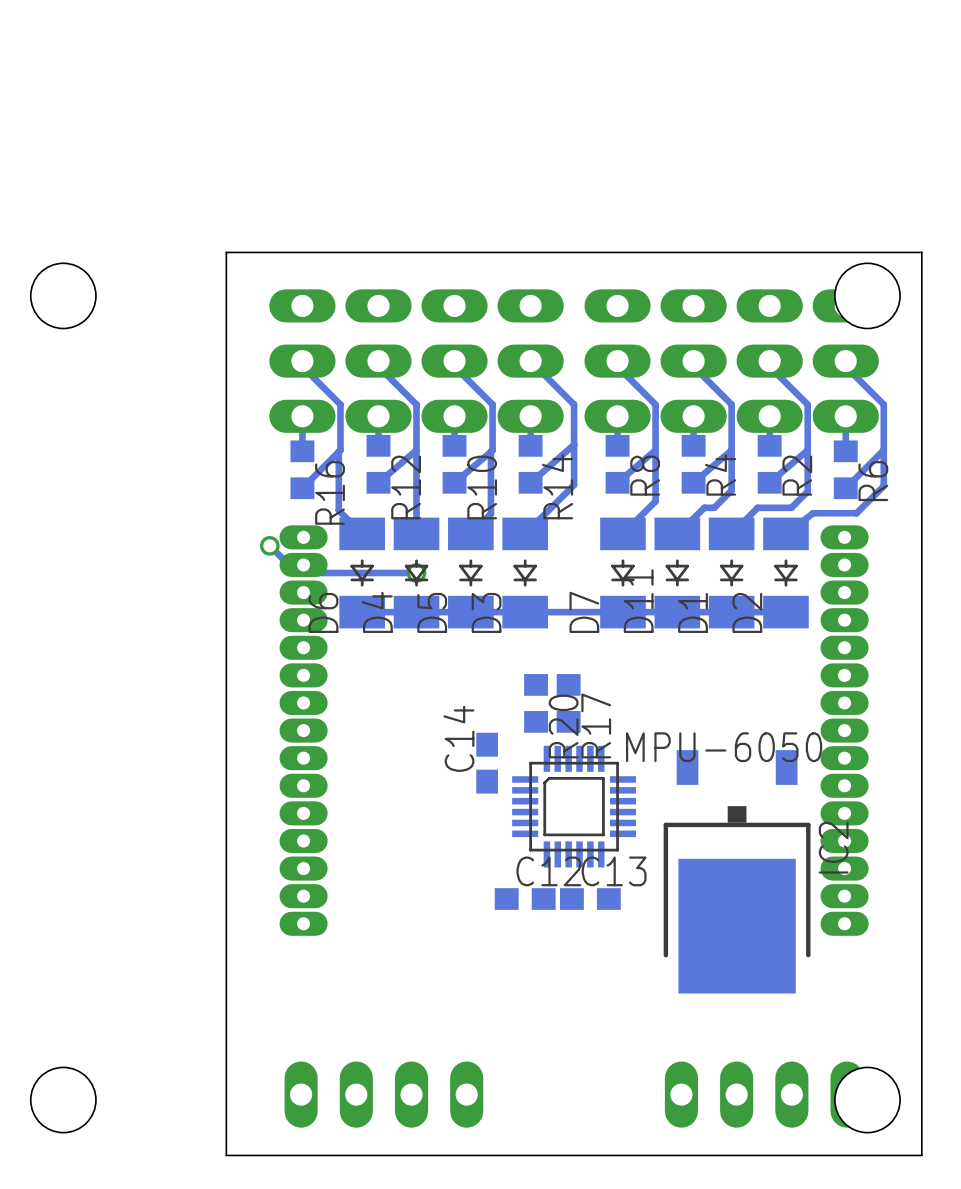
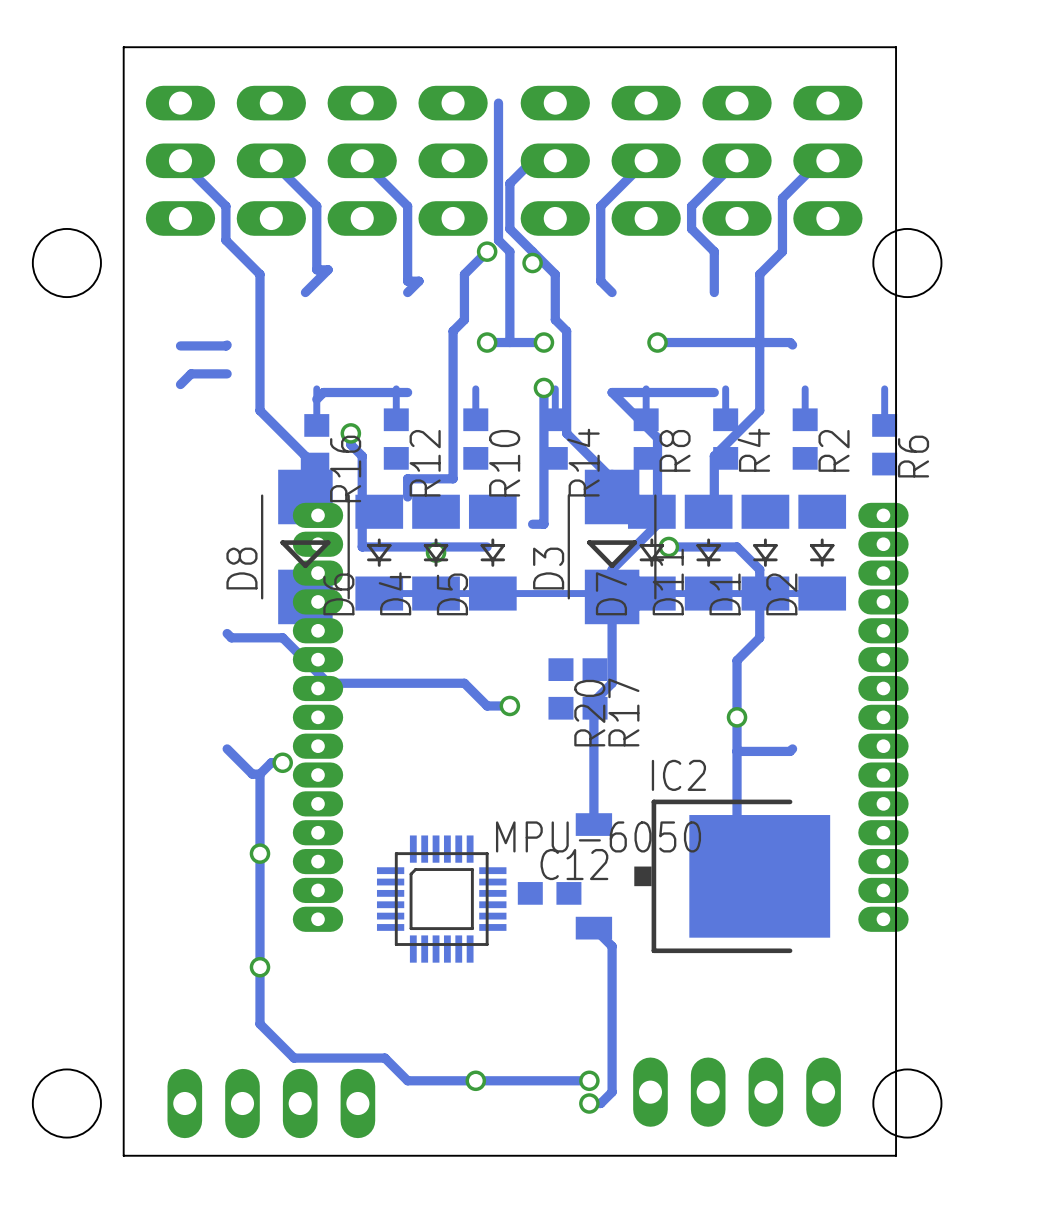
track: none -> (498, 103) (498, 240) (509, 251) (509, 342)
track: none -> (180, 160) (225, 206) (225, 240) (259, 274) (259, 410) (305, 456) (305, 496)
part: none -> (180, 160)
track: none -> (271, 160) (316, 206) (316, 269) (328, 269) (305, 292)
part: none -> (271, 160)
track: none -> (362, 160) (407, 206) (407, 281) (419, 281) (407, 292)
part: none -> (362, 160)
part: none -> (453, 160)
track: none -> (555, 160) (532, 160) (509, 183) (509, 228) (555, 274) (555, 319) (566, 331) (566, 433) (612, 478)
part: none -> (555, 160)
track: none -> (646, 160) (600, 206) (600, 281) (612, 292)
part: none -> (646, 160)
track: none -> (737, 160) (691, 206) (691, 228) (714, 251) (714, 292)
part: none -> (737, 160)
track: none -> (827, 160) (819, 160) (782, 198) (782, 251) (759, 274) (759, 410) (714, 456) (714, 496)
part: none -> (827, 160)
board edge: (921, 252) (226, 252) (226, 1155) (921, 1155) (921, 252) -> (896, 47) (896, 1155) (123, 1155) (123, 47) (896, 47)
track: none -> (487, 251) (464, 274) (464, 319) (453, 331) (453, 478) (407, 478) (407, 496)
via: none -> (487, 251)
via: none -> (532, 263)
track: (302, 361) (302, 366) (340, 404) (340, 450) (302, 488) -> none
part: (302, 361) -> none
track: (378, 361) (378, 366) (416, 404) (416, 533) -> none
part: (378, 361) -> none
track: (454, 361) (454, 366) (492, 404) (492, 450) (490, 451) -> none
part: (454, 361) -> none
track: (530, 361) (574, 404) (574, 484) (525, 533) -> none
part: (530, 361) -> none
track: (617, 361) (617, 366) (655, 404) (655, 501) (622, 533) -> none
part: (617, 361) -> none
track: (693, 361) (693, 366) (731, 404) (731, 490) (714, 507) (704, 507) (677, 533) -> none
part: (693, 361) -> none
track: (769, 361) (769, 366) (807, 404) (807, 491) (791, 507) (757, 507) (731, 533) -> none
part: (769, 361) -> none
track: (845, 361) (845, 366) (883, 404) (883, 486) (856, 513) (813, 513) (785, 533) -> none
part: (845, 361) -> none
via: none -> (487, 342)
track: none -> (543, 342) (487, 342)
via: none -> (543, 342)
track: none -> (657, 342) (790, 342) (792, 345)
via: none -> (657, 342)
track: none -> (227, 345) (180, 345)
track: none -> (227, 373) (191, 373) (180, 384)
track: none -> (543, 387) (543, 524) (532, 524)
via: none -> (543, 387)
track: none -> (407, 392) (323, 392) (316, 399)
track: none -> (714, 392) (612, 392) (657, 437) (657, 524) (612, 569) (612, 683) (593, 701) (593, 824)
track: (574, 444) (530, 482) -> none
track: (416, 450) (378, 482) -> none
track: (655, 450) (617, 482) -> none
track: (731, 450) (693, 482) -> none
track: (807, 450) (769, 482) -> none
track: (883, 450) (845, 488) -> none
track: (338, 451) (338, 510) (362, 533) -> none
track: (490, 451) (454, 482) -> none
track: (490, 451) (490, 513) (470, 533) -> none
track: none -> (350, 433) (350, 444) (362, 456) (362, 546) (487, 546)
D3 footprint: [502, 517, 549, 629] -> [567, 469, 657, 625]
track: (269, 545) (296, 573) (416, 573) -> none
via position: (269, 545) -> (350, 433)
D8: none -> (305, 546)
track: none -> (668, 546) (737, 546) (759, 569) (759, 637) (737, 660) (737, 864) (759, 876)
via: none -> (668, 546)
track: none -> (227, 633) (231, 637) (282, 637) (328, 683) (464, 683) (487, 705) (509, 705)
via: none -> (509, 705)
via: none -> (737, 717)
track: none -> (227, 748) (252, 774) (259, 774)
track: none -> (792, 748) (790, 751) (737, 751)
C14: (487, 763) -> none
track: none -> (282, 762) (271, 762) (259, 774)
via: none -> (282, 762)
track: none -> (259, 774) (259, 1024) (294, 1058) (384, 1058) (407, 1080) (589, 1080)
part position: (574, 806) -> (441, 899)
via: none -> (259, 853)
IC2 rotation: 0° (737, 871) -> 90° counterclockwise (702, 876)
C13: (590, 899) -> none
track: none -> (593, 928) (612, 946) (612, 1092) (600, 1103) (589, 1103)
via: none -> (259, 967)
via: none -> (475, 1080)
via: none -> (589, 1080)
part position: (383, 1094) -> (271, 1103)
part position: (764, 1094) -> (737, 1092)
via: none -> (589, 1103)

